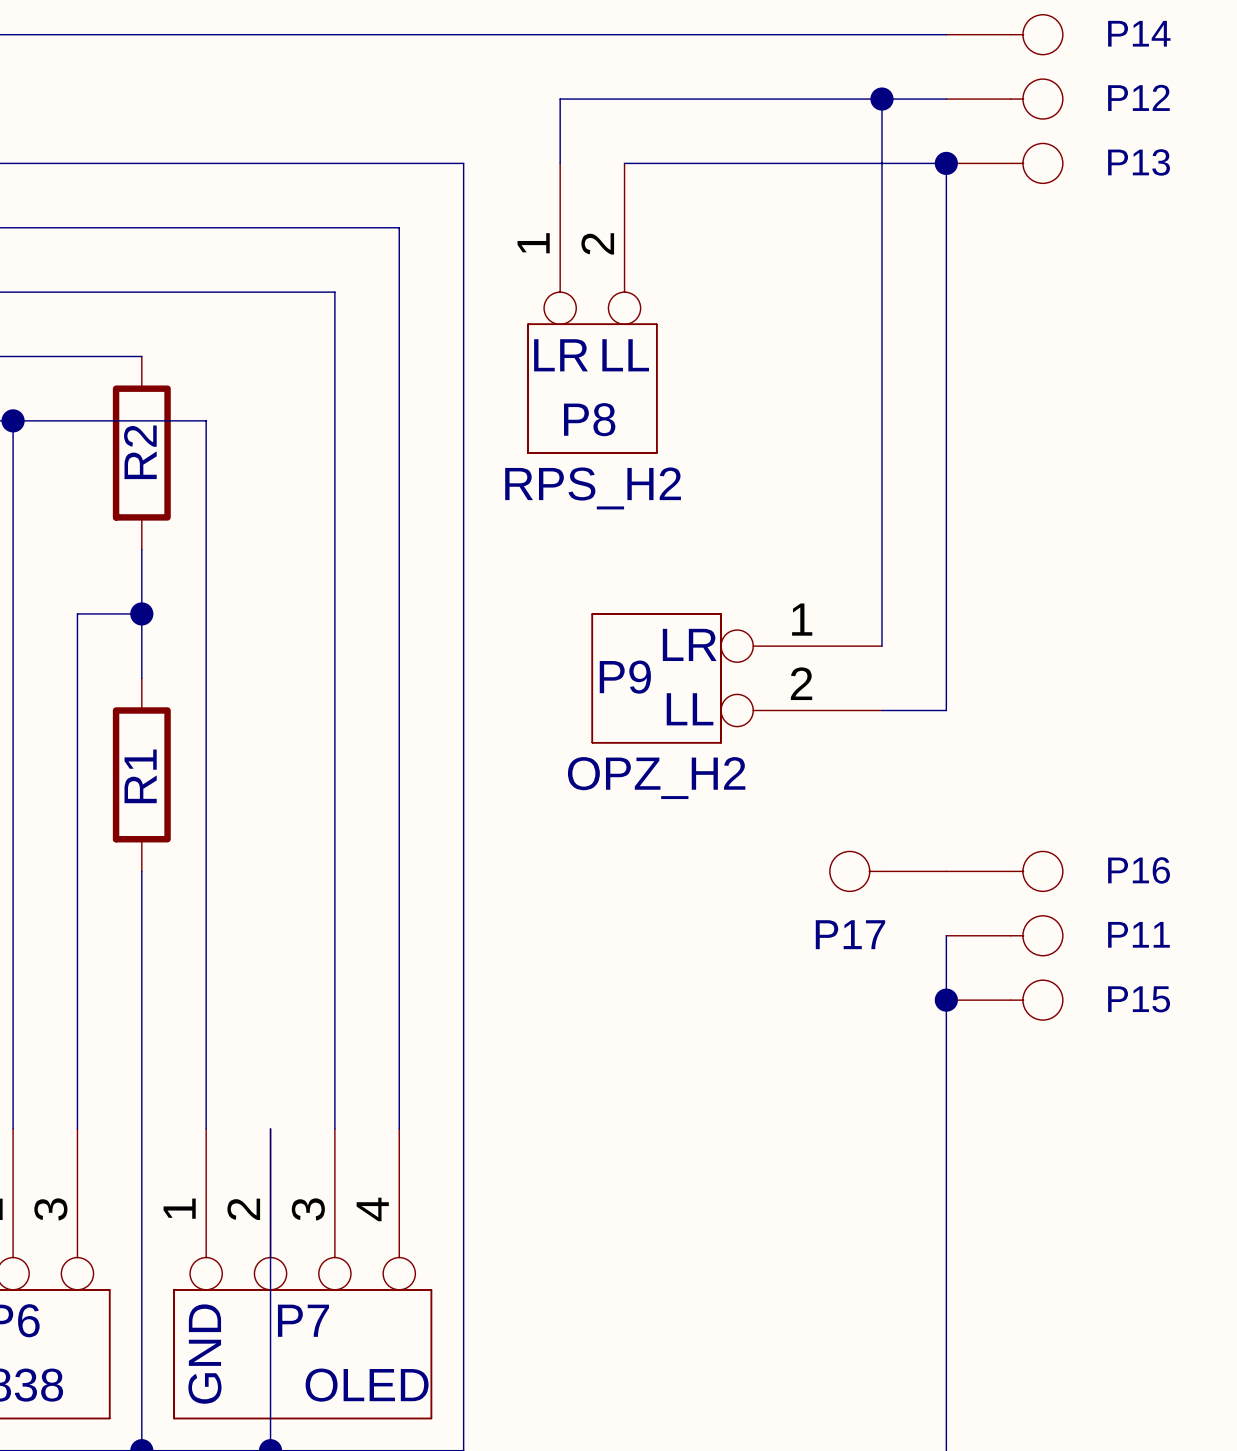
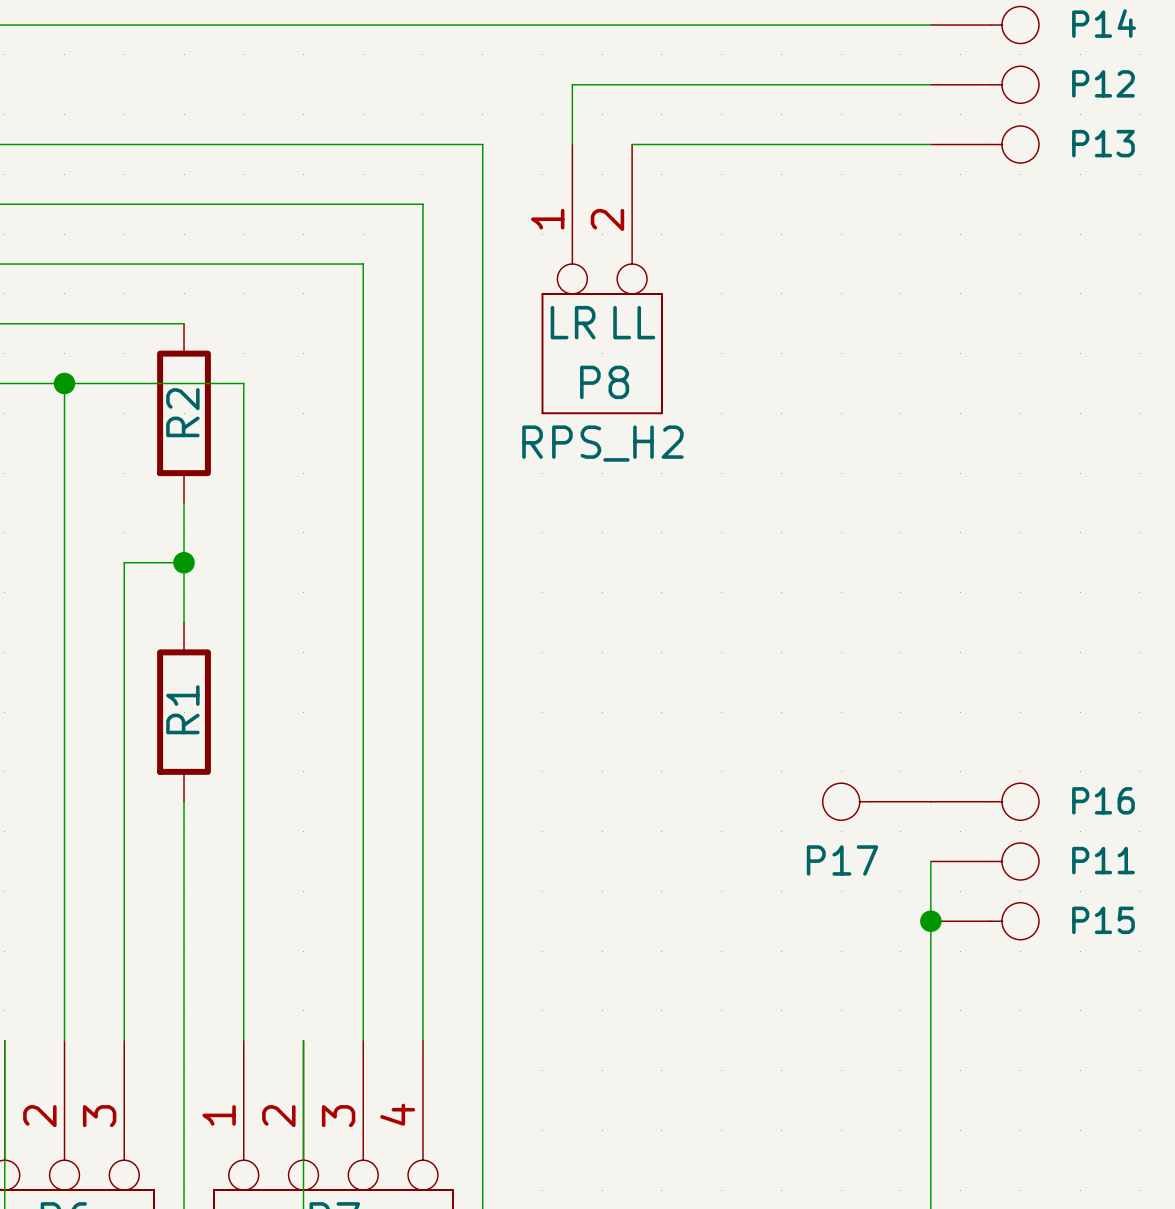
wire: (881, 99) (881, 646) -> none
junction: (881, 99) -> none
wire: (946, 163) (946, 710) (881, 710) -> none
junction: (946, 163) -> none
P9: (737, 678) -> none

